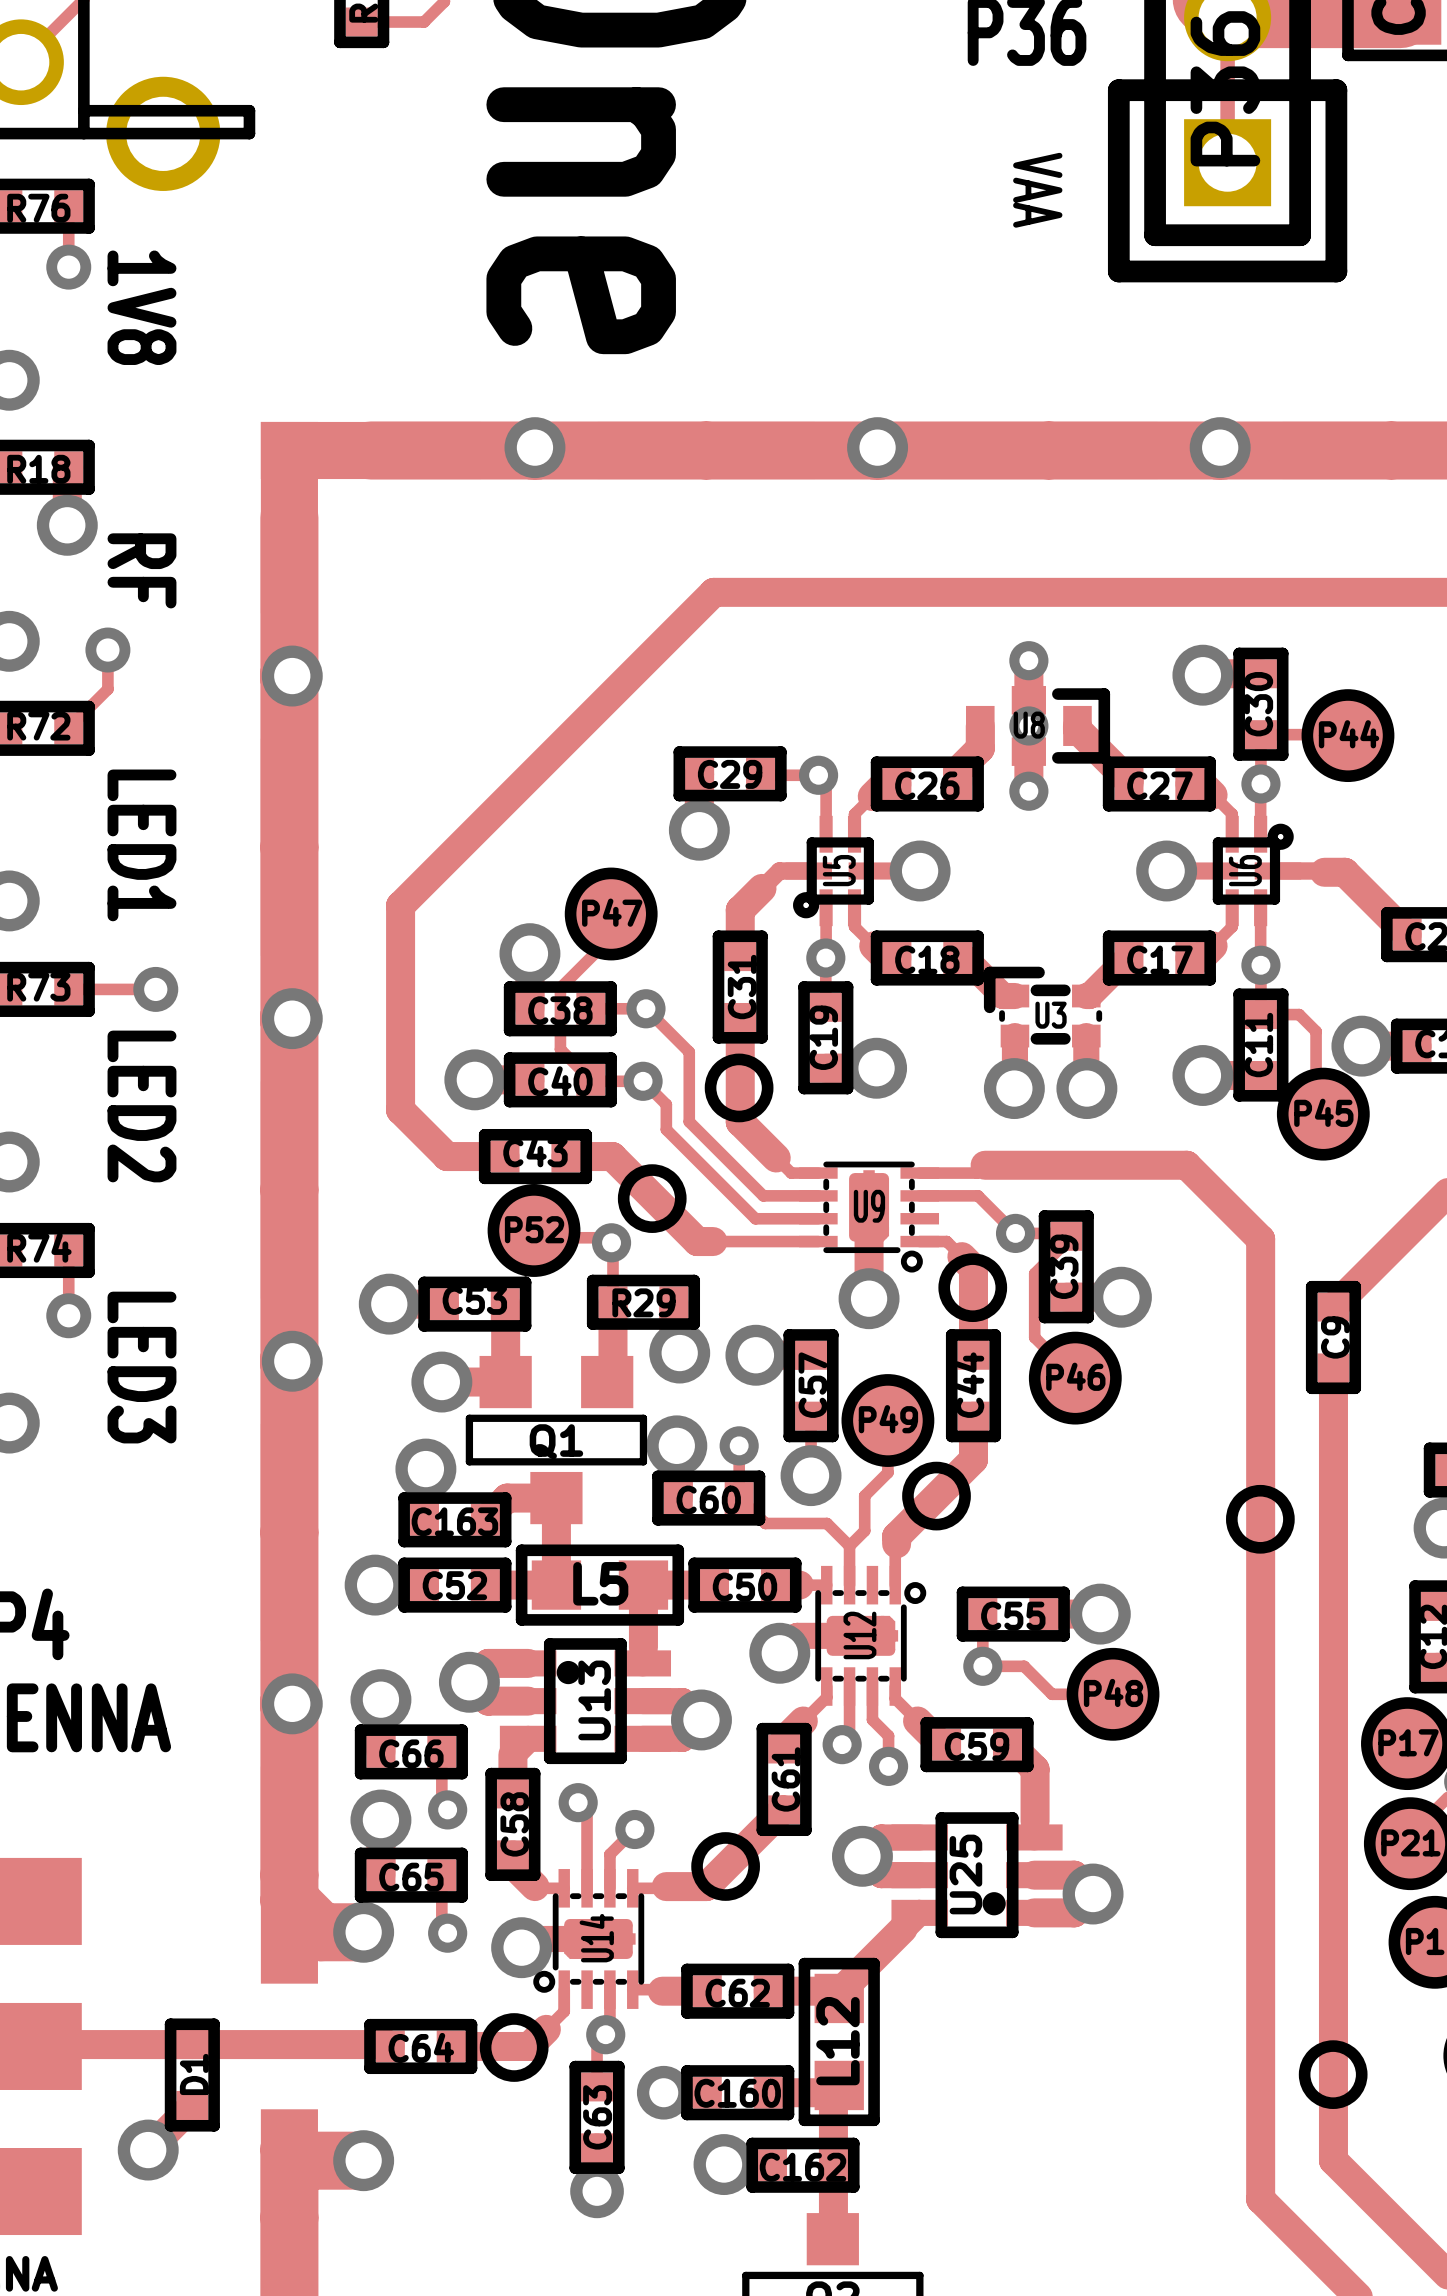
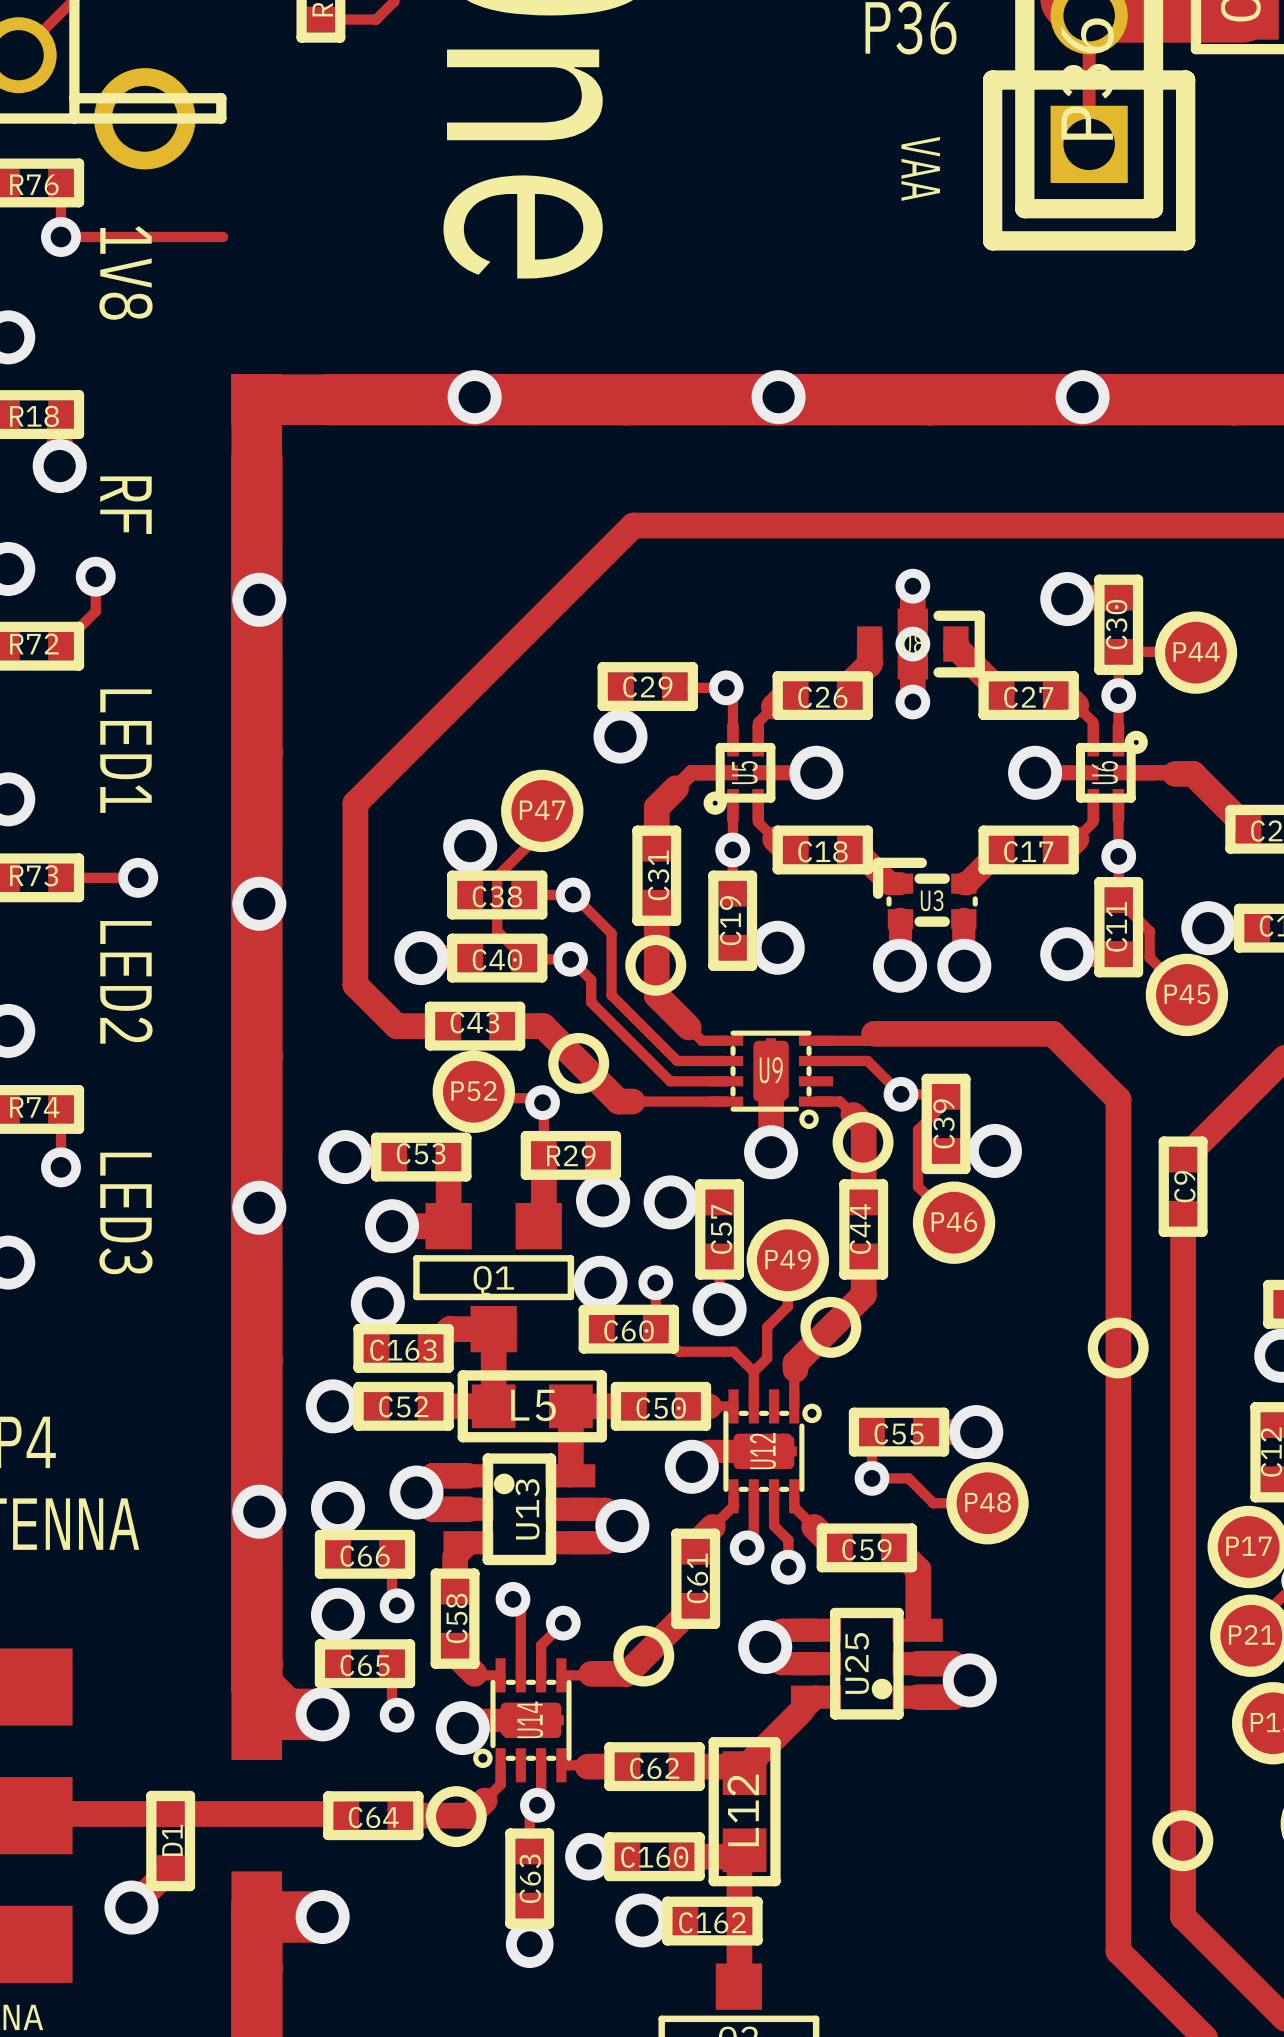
track: none -> (60, 237) (223, 237)
track: (1260, 1014) (1299, 1014) (1316, 1031) (1316, 1106) (1323, 1114) -> (1118, 900) (1149, 931) (1149, 957) (1186, 994)
P45 position: (1323, 1114) -> (1186, 994)

